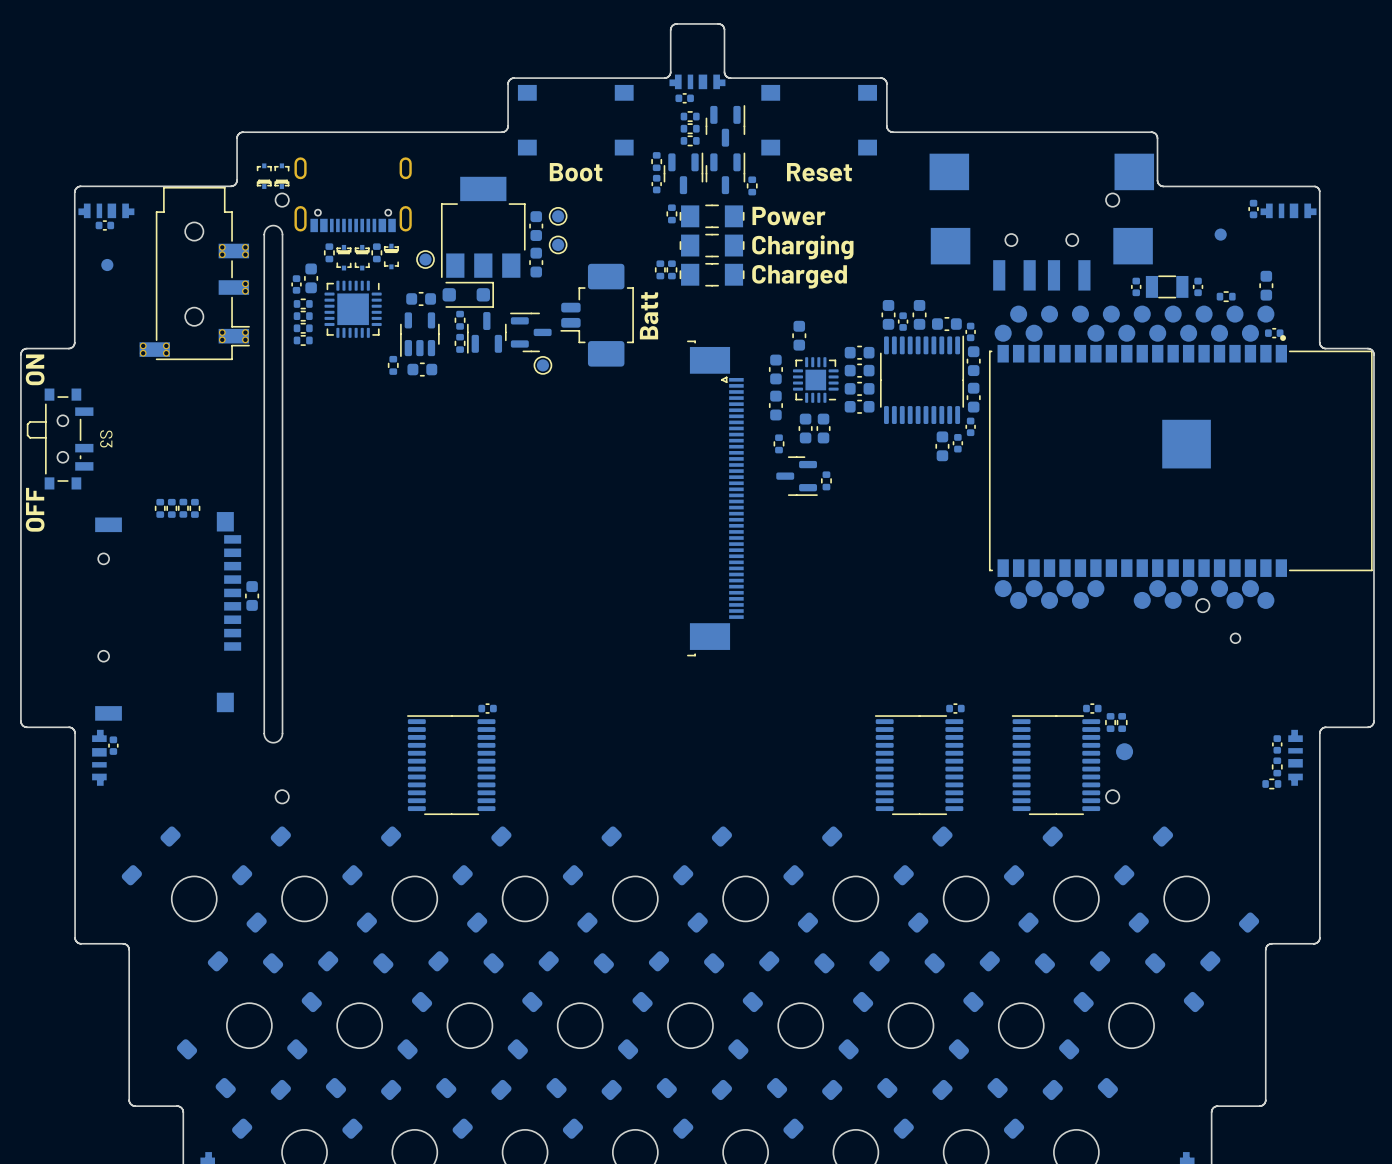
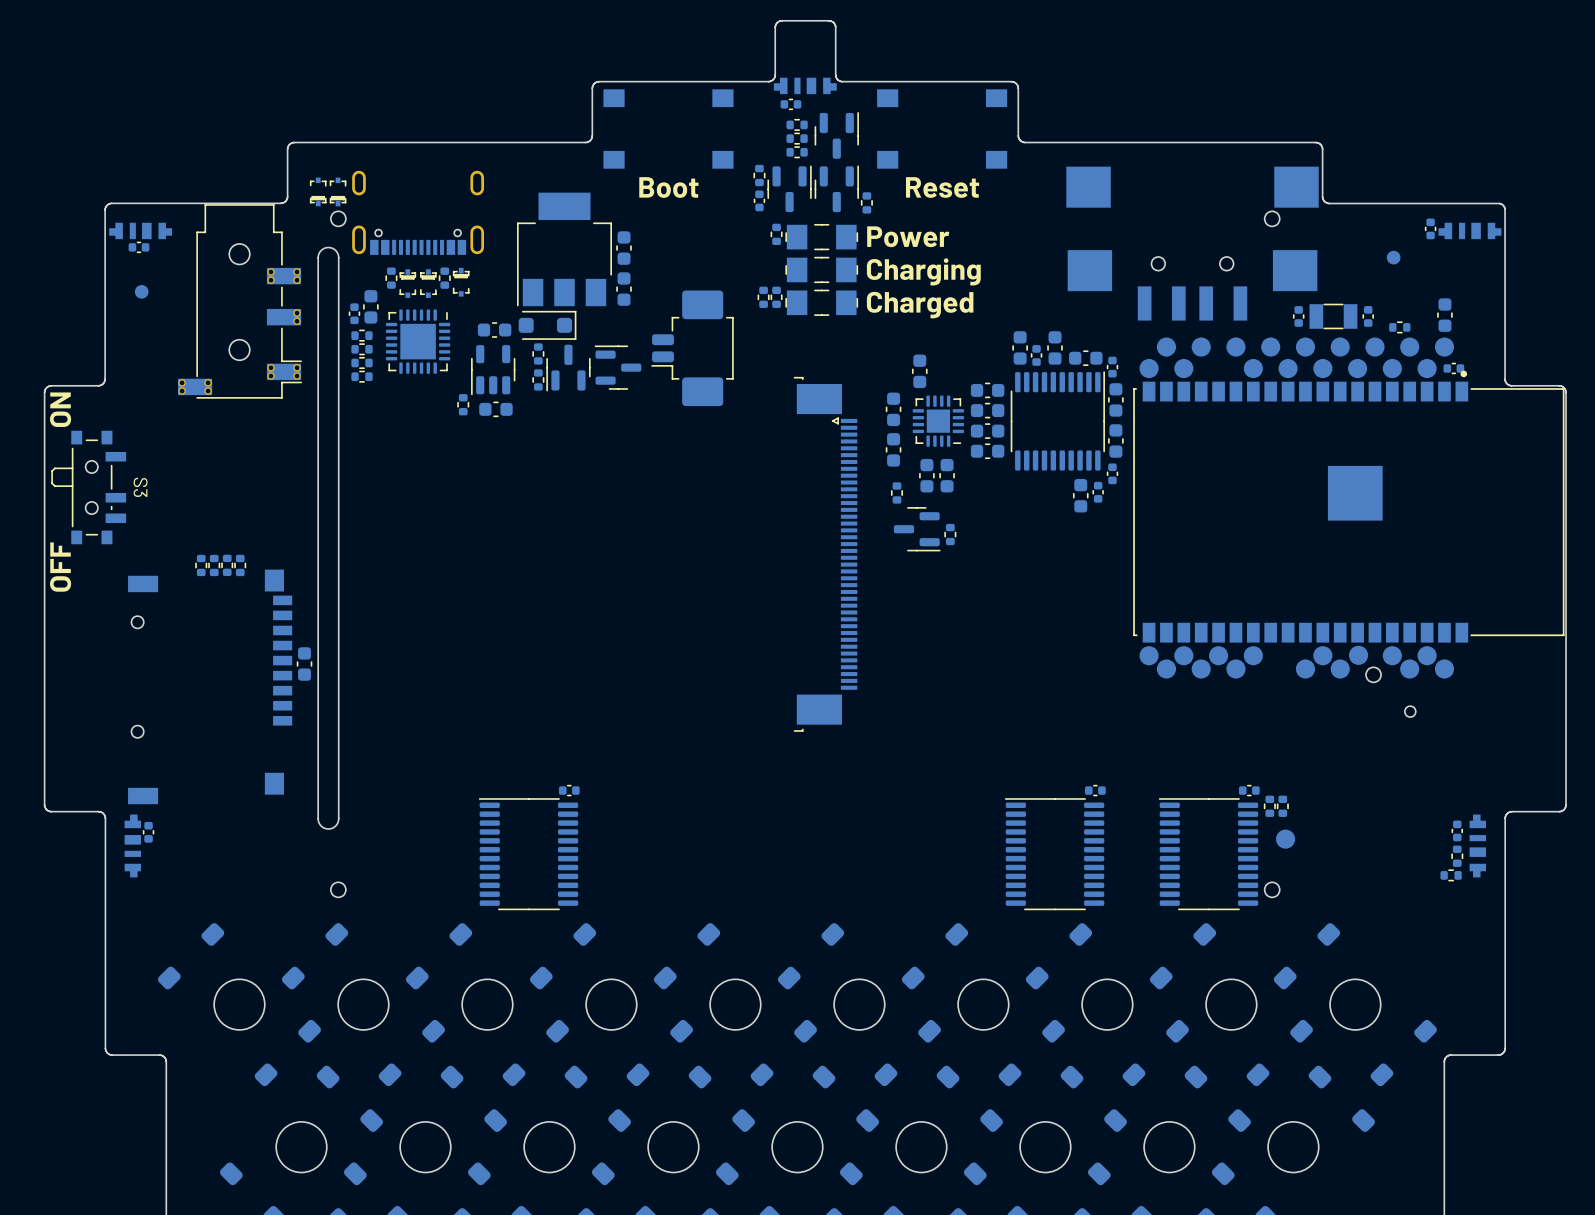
part: (558, 216) -> none
part: (558, 244) -> none
part: (425, 259) -> none
text: Batt (649, 315) -> none
part: (542, 365) -> none

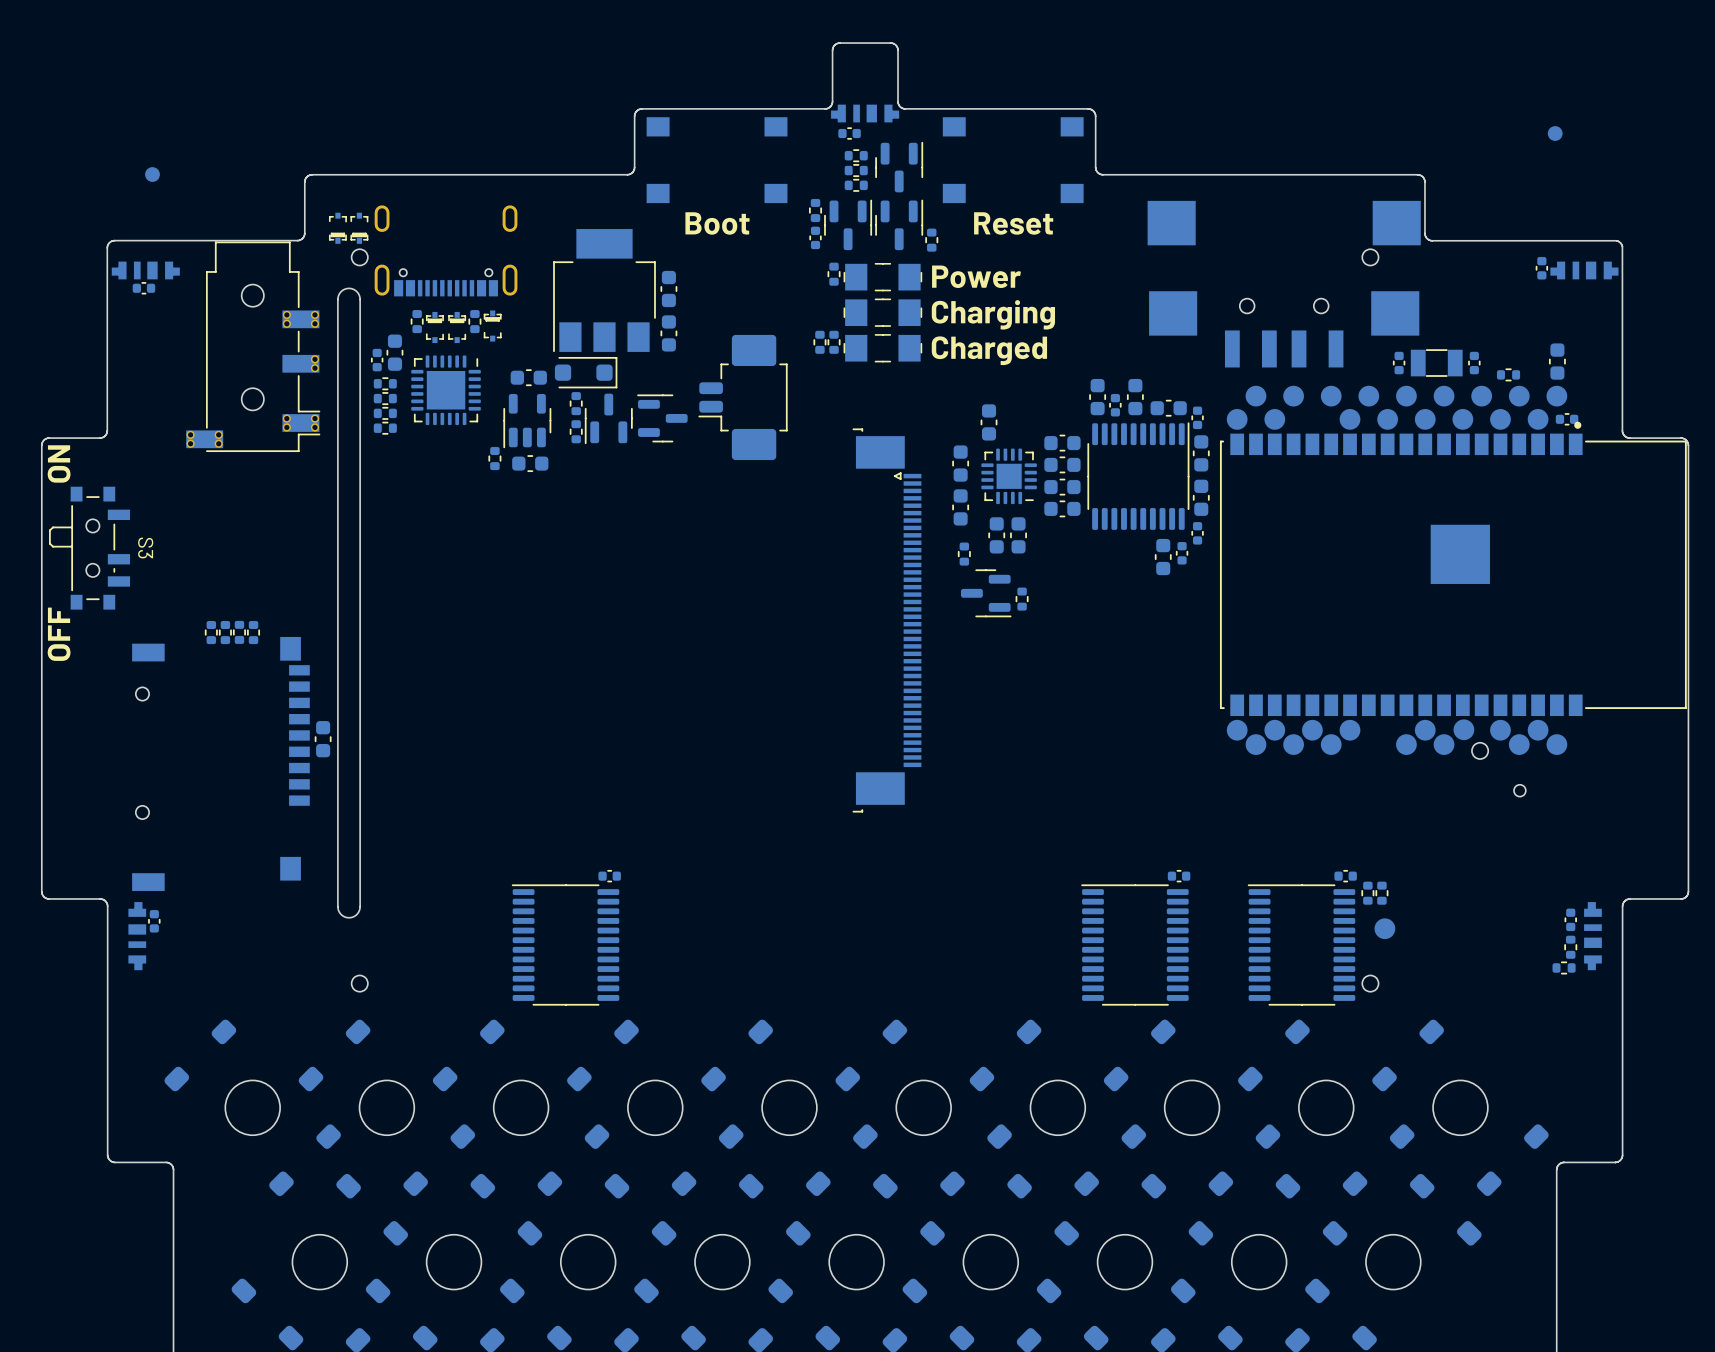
part position: (1393, 257) -> (1555, 133)
part position: (141, 291) -> (152, 174)

